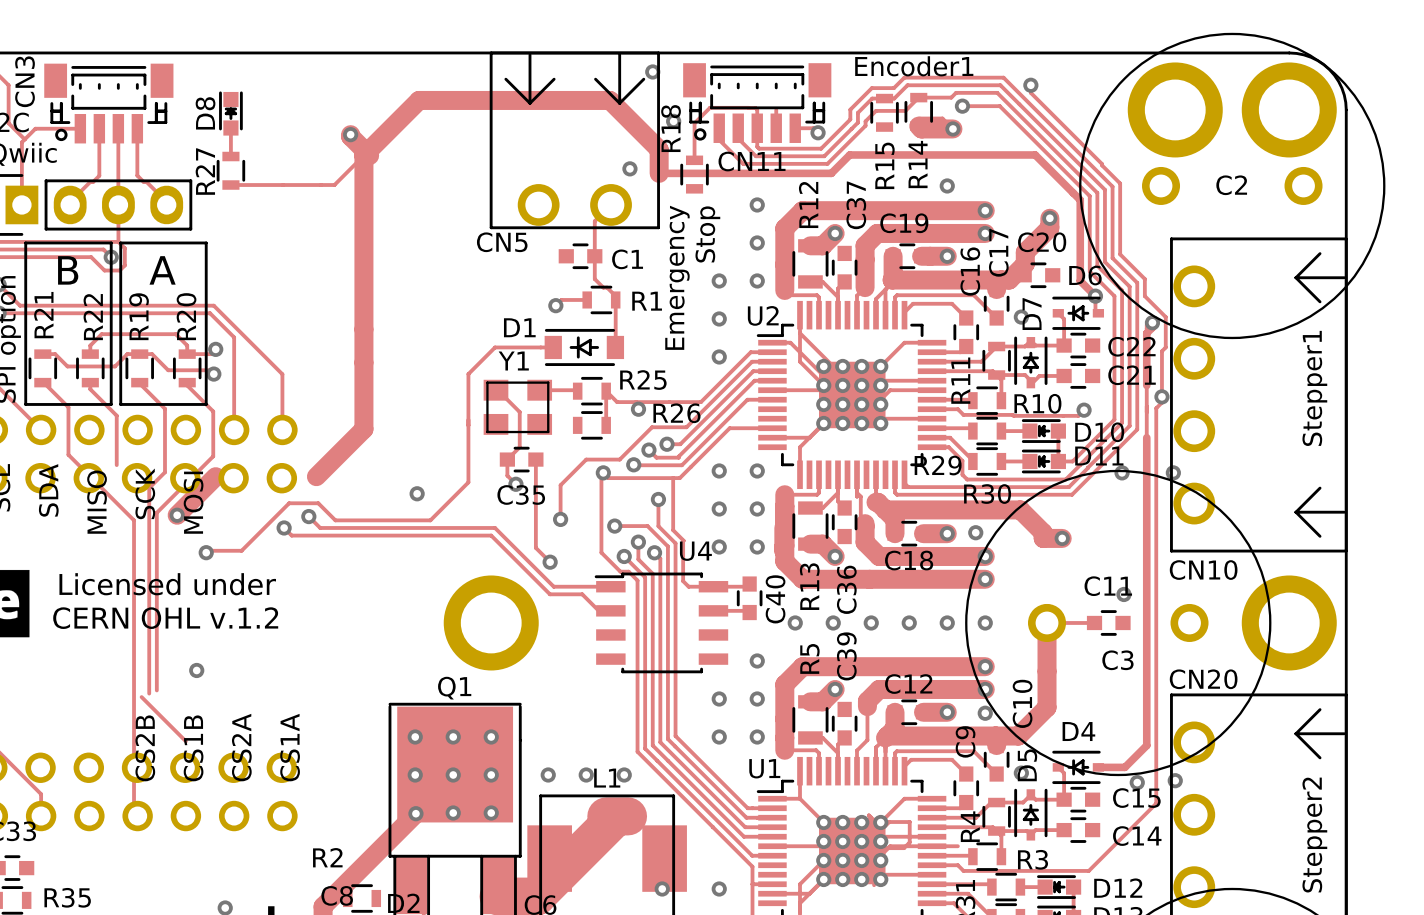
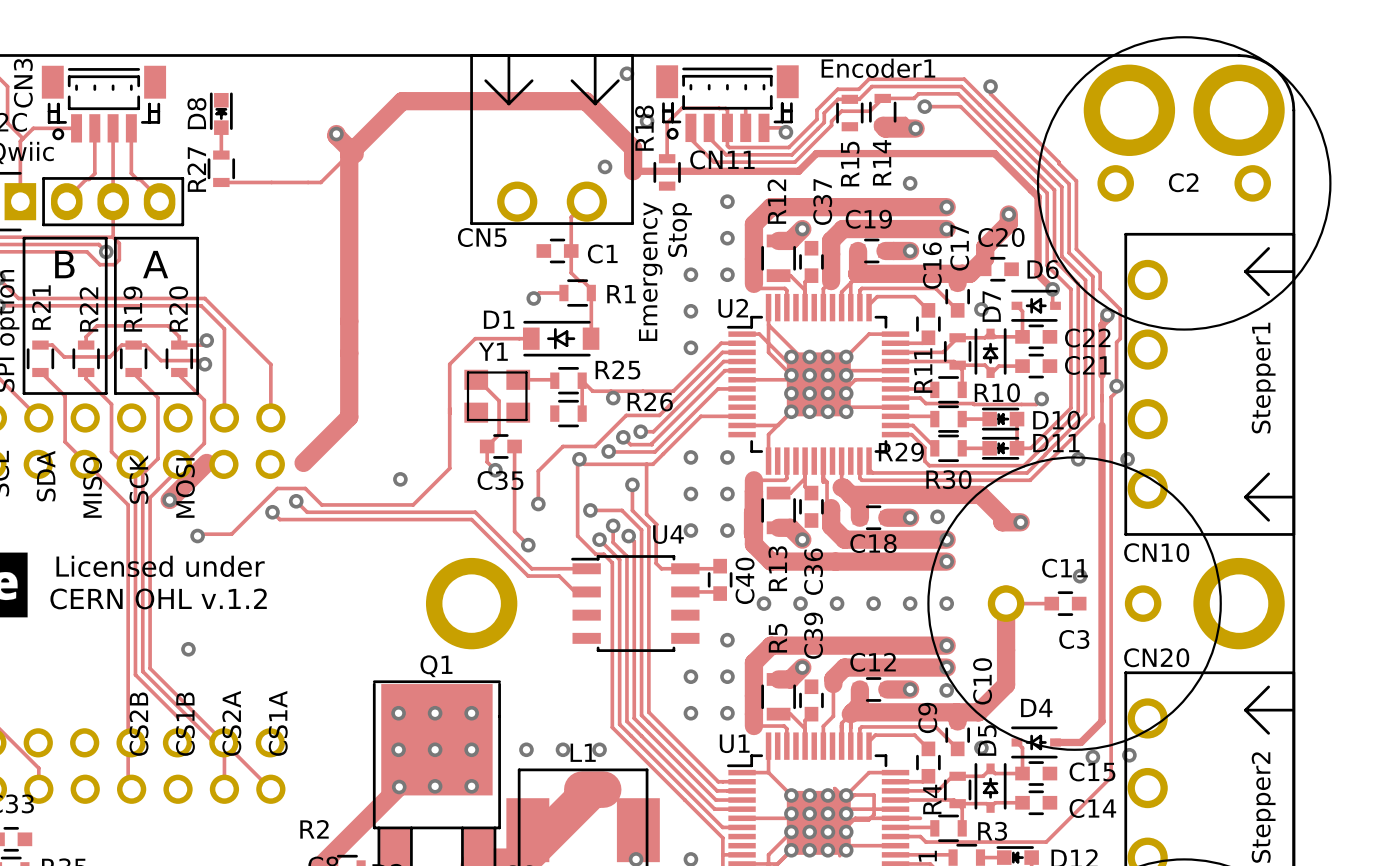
track: none -> (111, 451) (135, 475) (135, 674)
track: none -> (150, 668) (270, 789)
track: none -> (142, 671) (224, 753) (224, 789)

